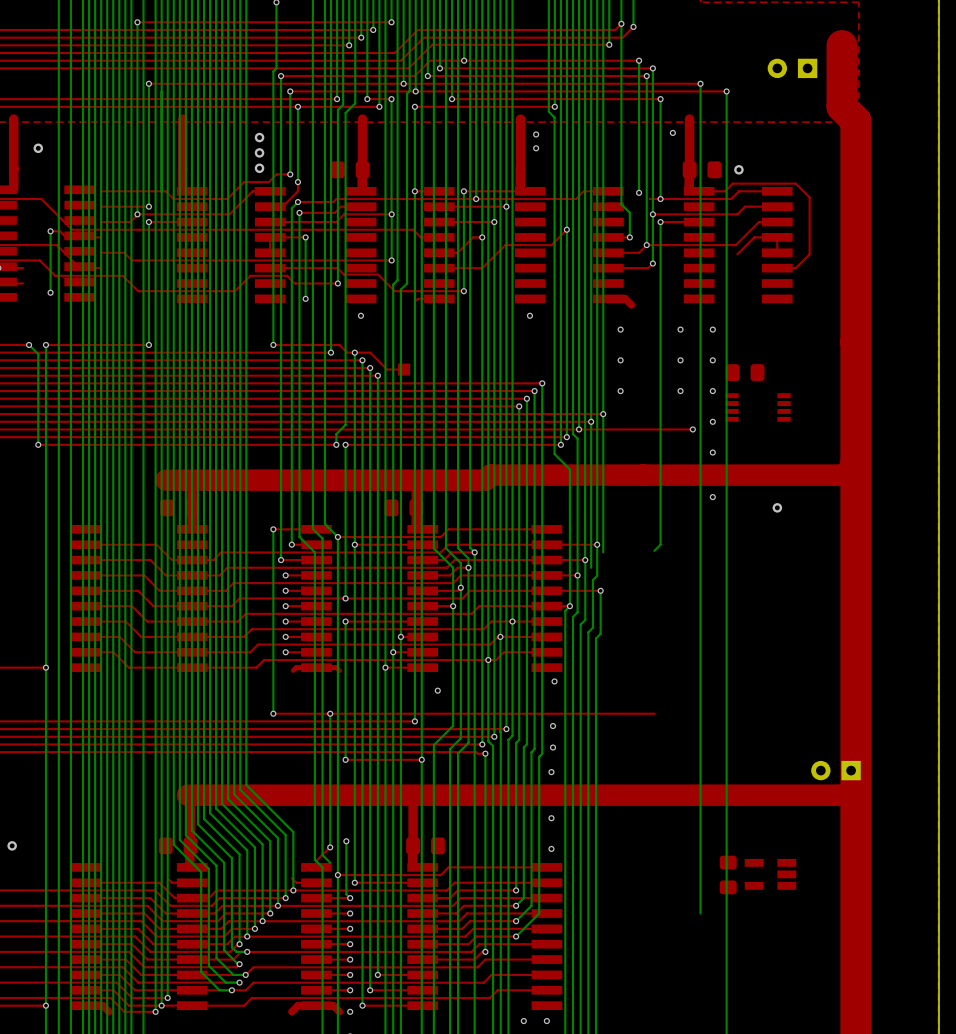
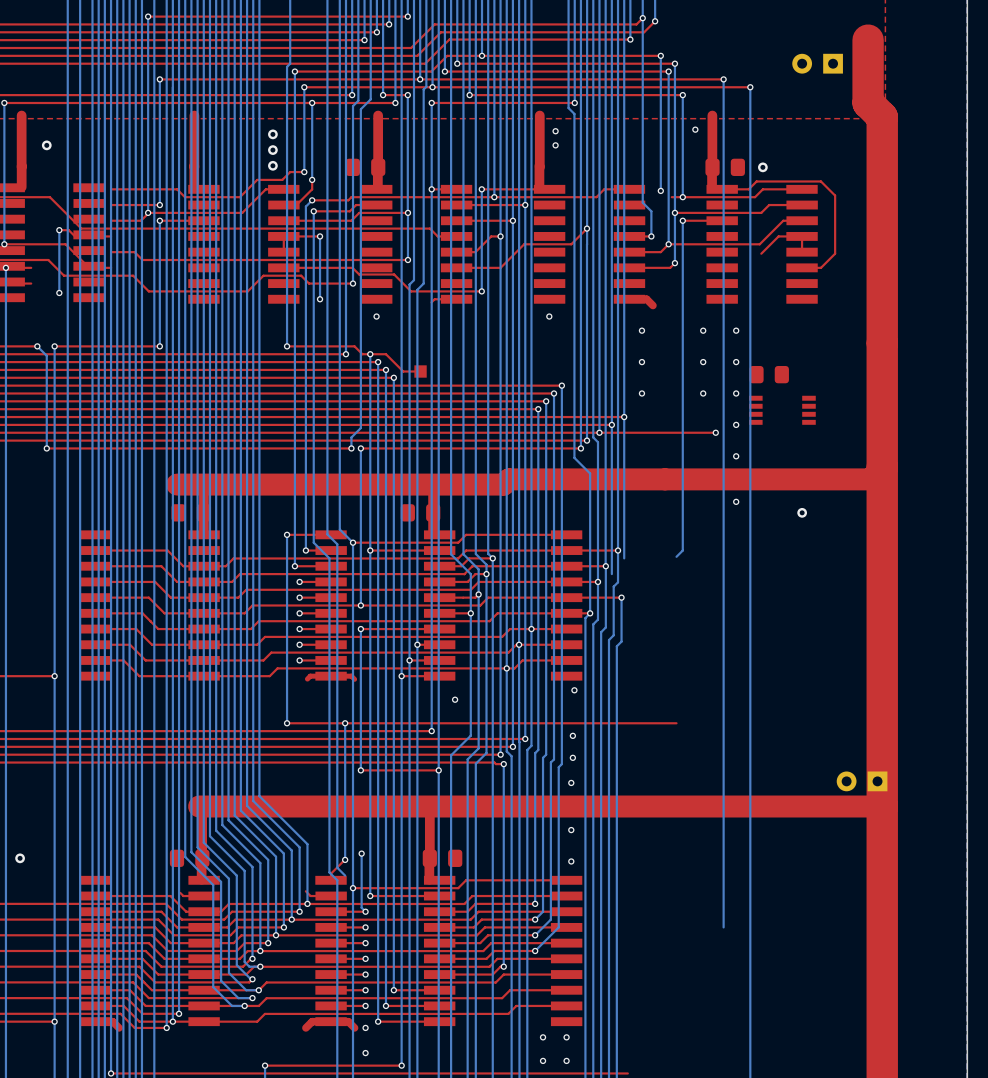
part: (728, 874) -> none
part: (770, 874) -> none

